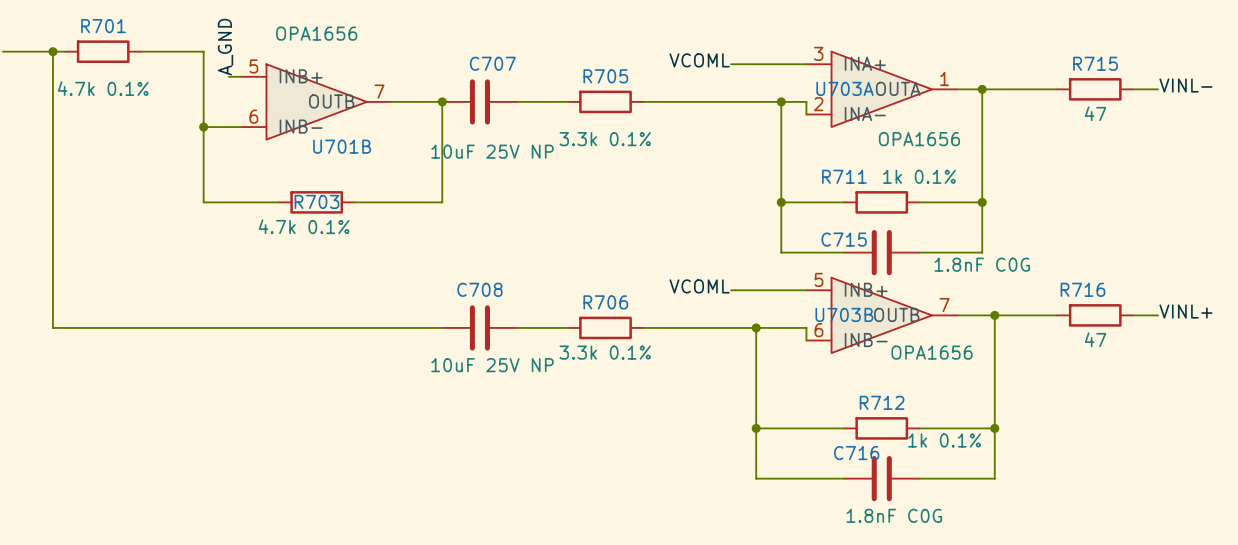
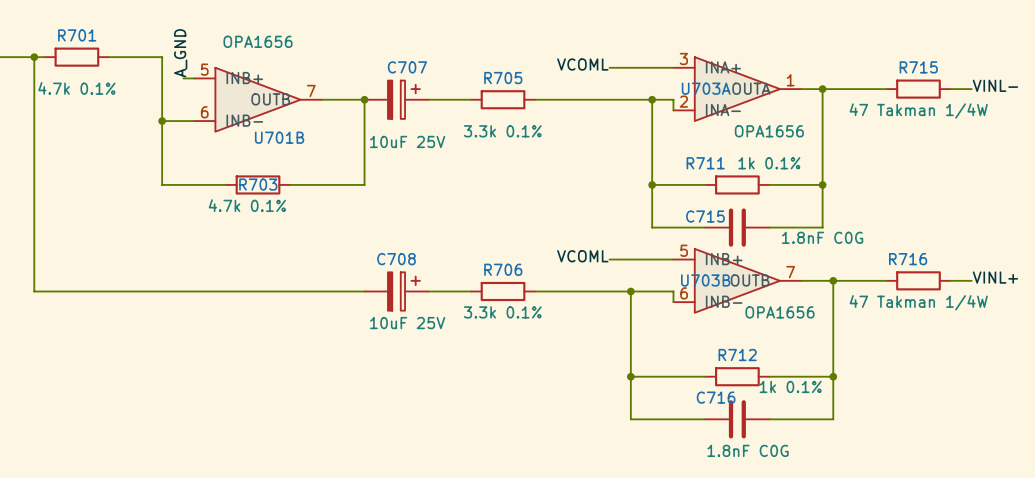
C707 symbol: [442, 79, 518, 125] -> [364, 80, 429, 119]
R715 value: 47 (1095, 113) -> 47 Takman 1/4W (918, 111)
C707 value: 10uF 25V NP (492, 151) -> 10uF 25V (407, 141)
C708 symbol: [442, 305, 518, 351] -> [364, 272, 429, 311]
R716 value: 47 (1095, 339) -> 47 Takman 1/4W (918, 302)
C708 value: 10uF 25V NP (492, 365) -> 10uF 25V (407, 323)

